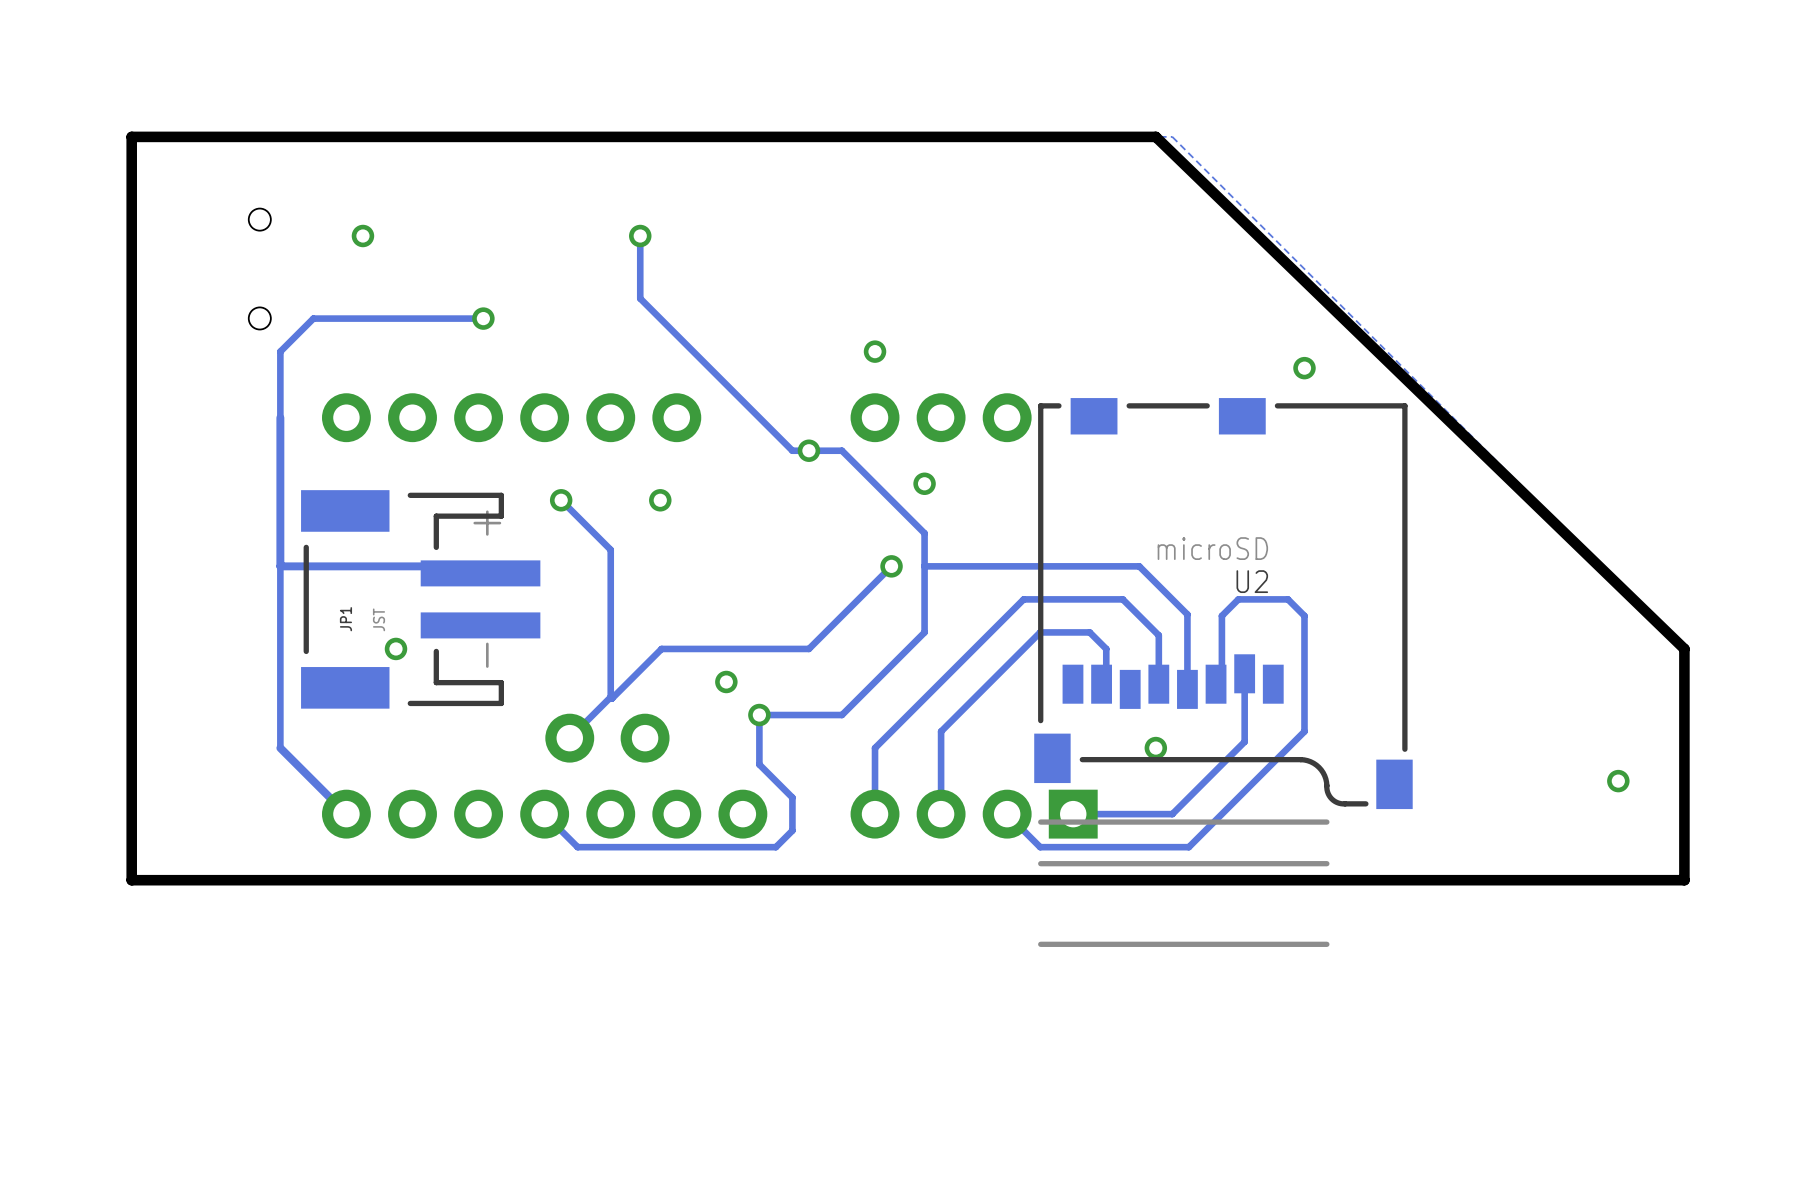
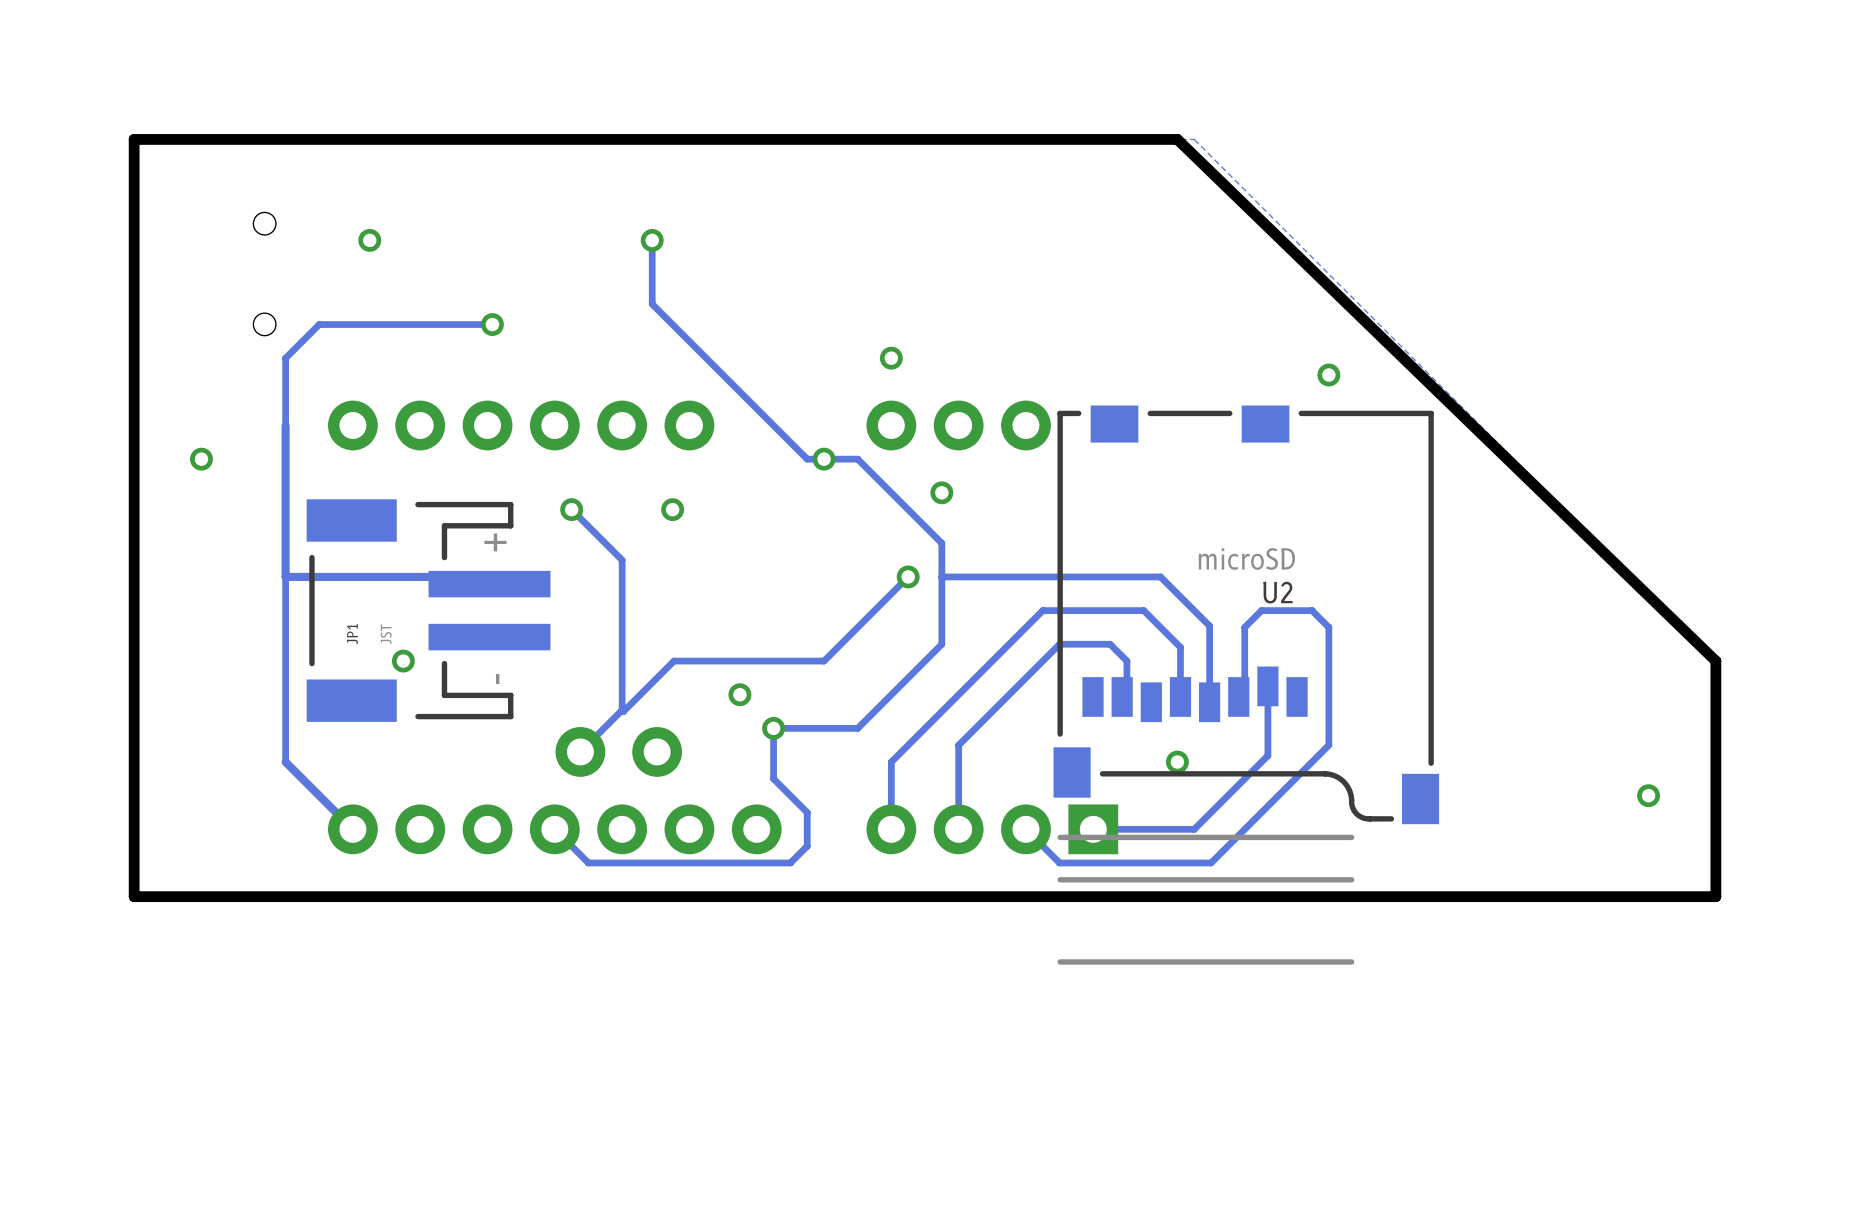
via: none -> (201, 459)

